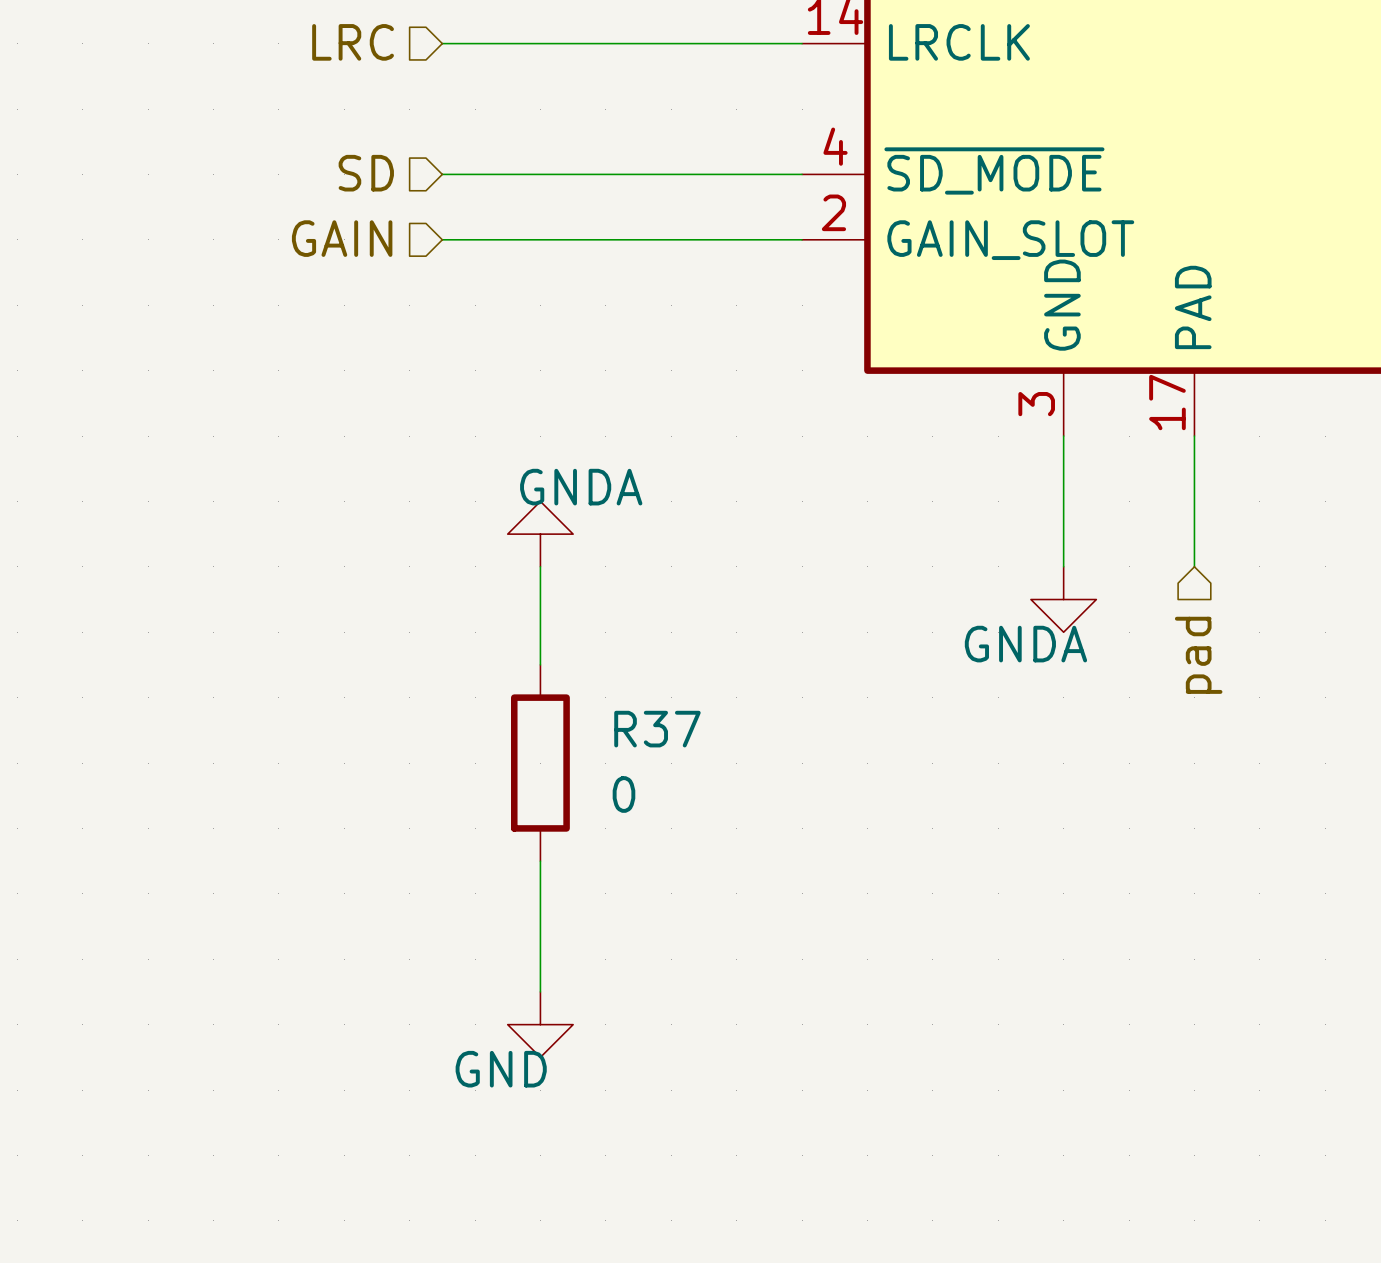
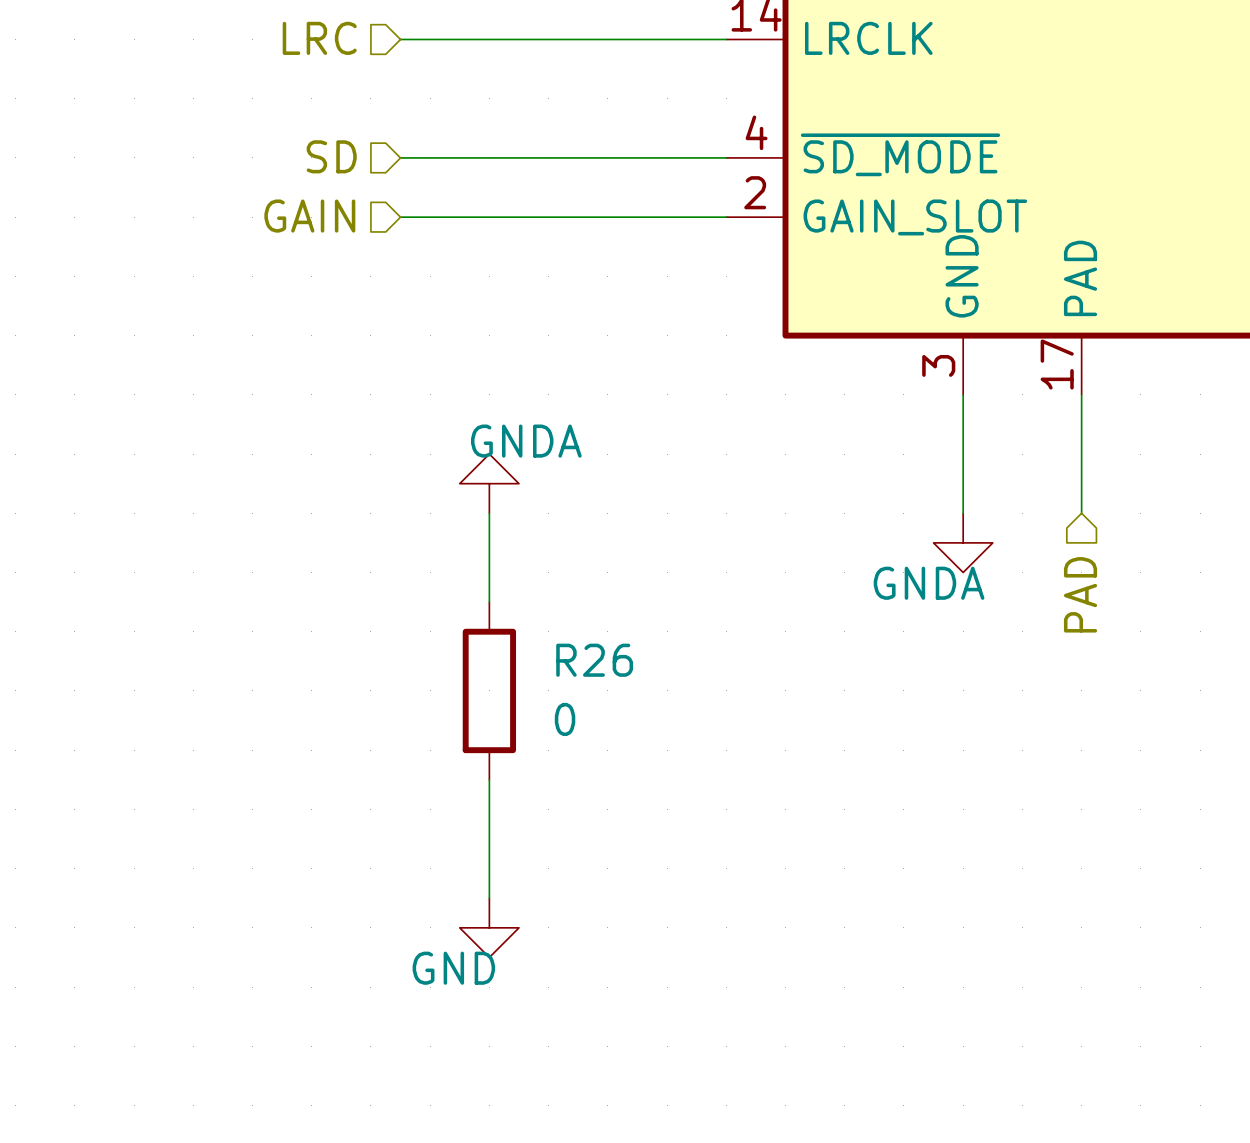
hierarchical label: pad (1198, 655) -> PAD (1080, 594)
R37 name: R37 (657, 729) -> R26 (594, 660)

